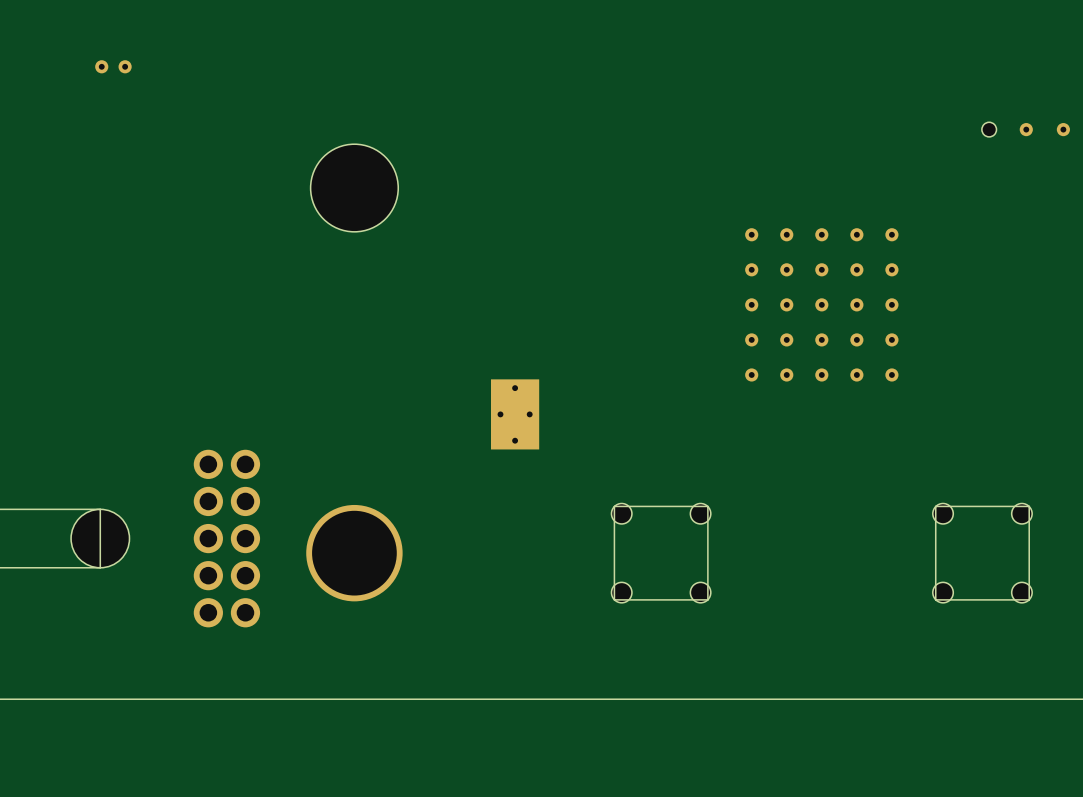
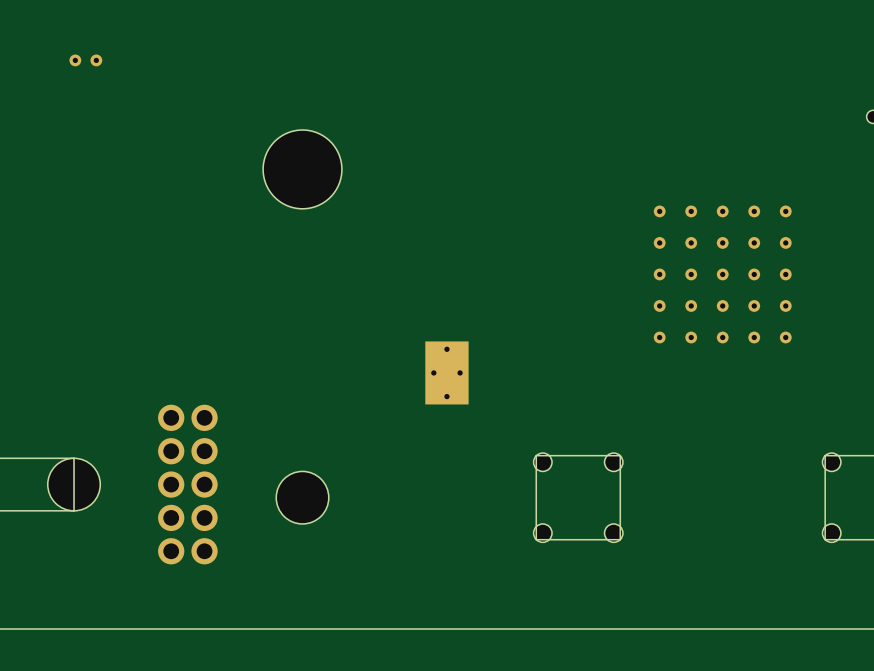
part footprint: [306, 504, 403, 602] -> [276, 471, 329, 524]

